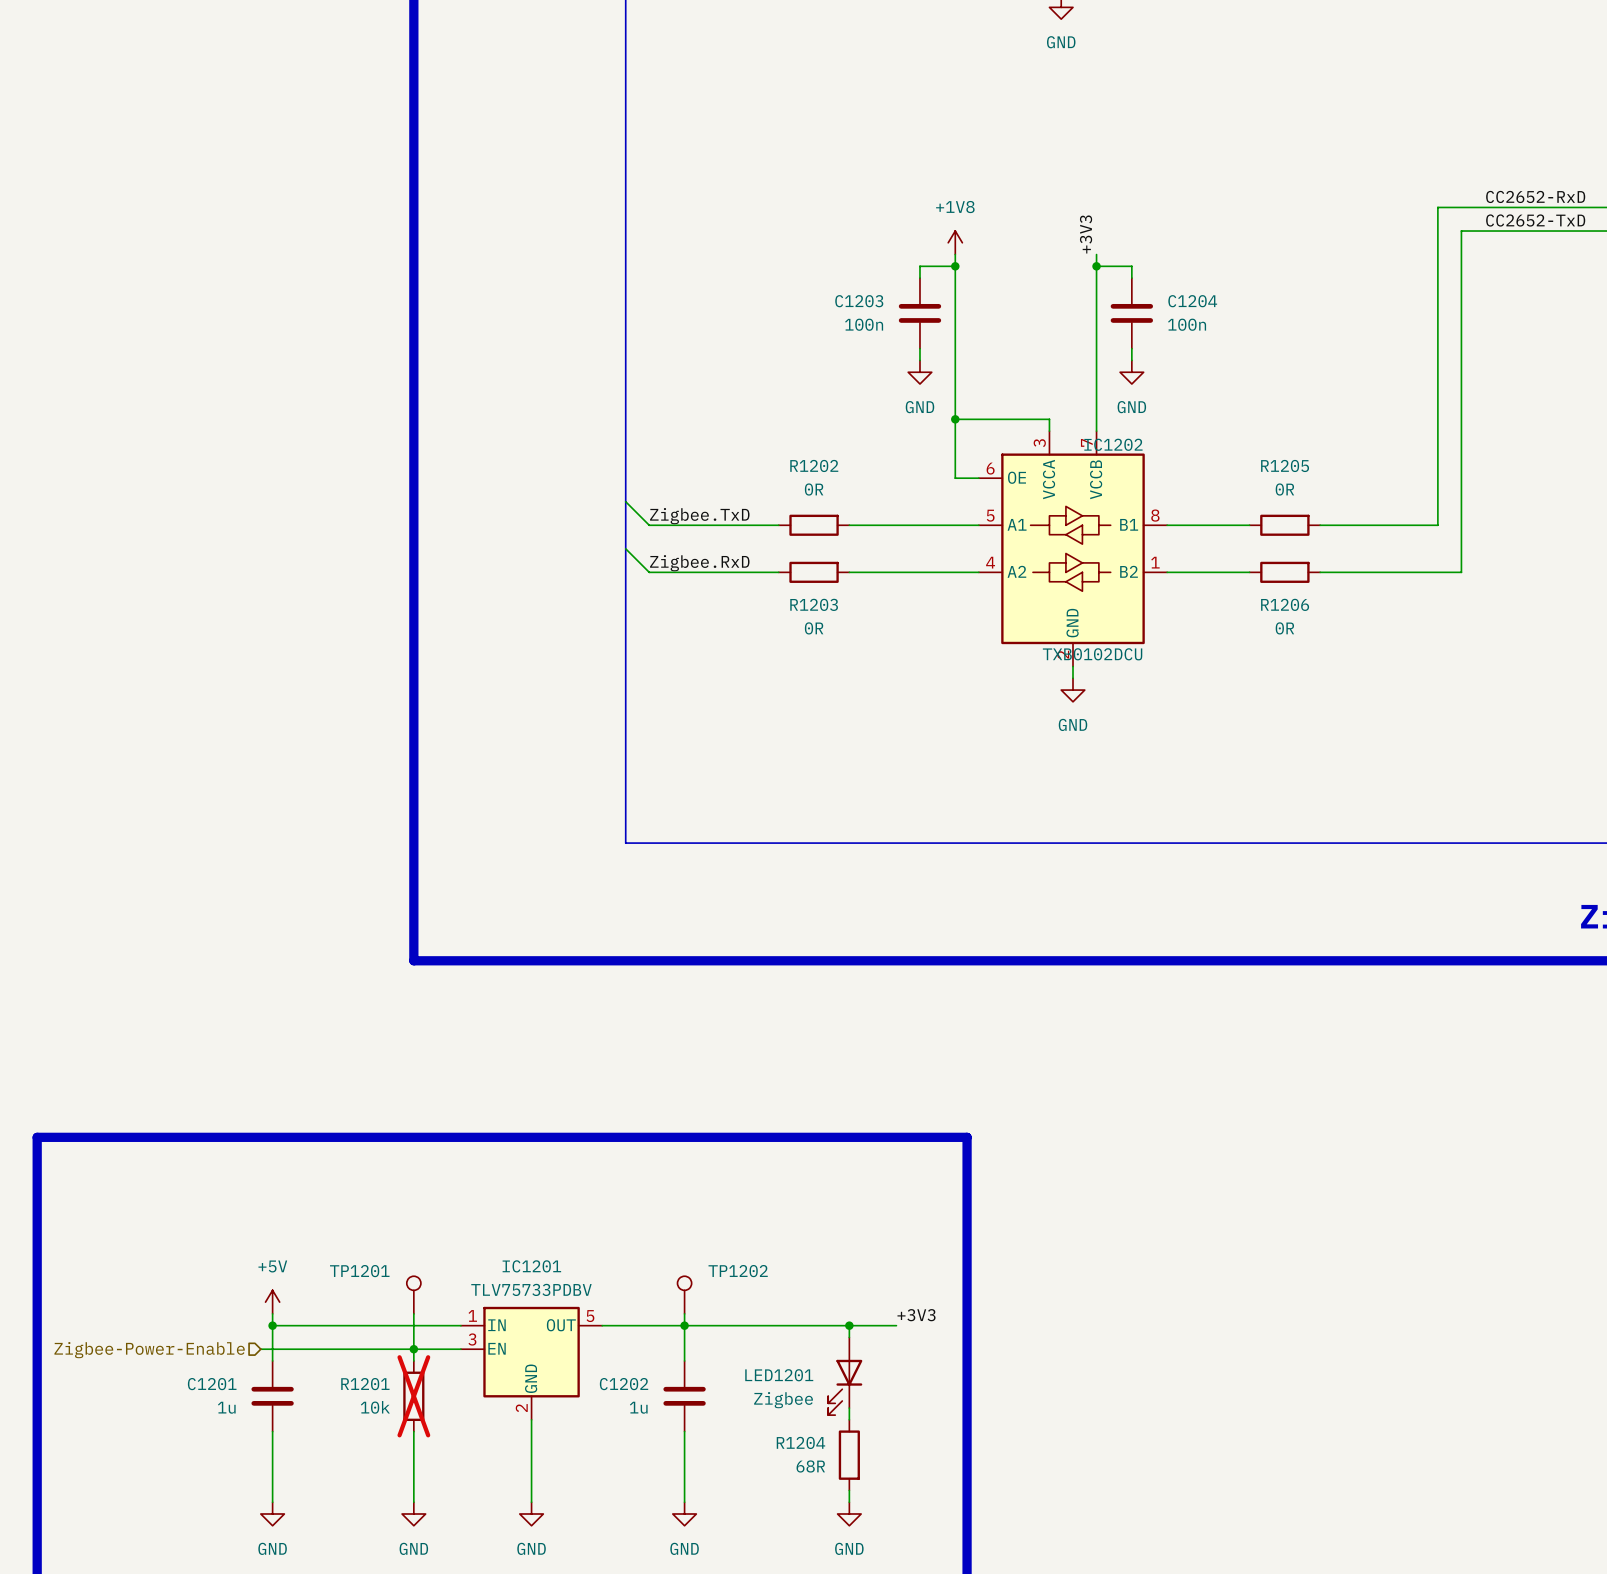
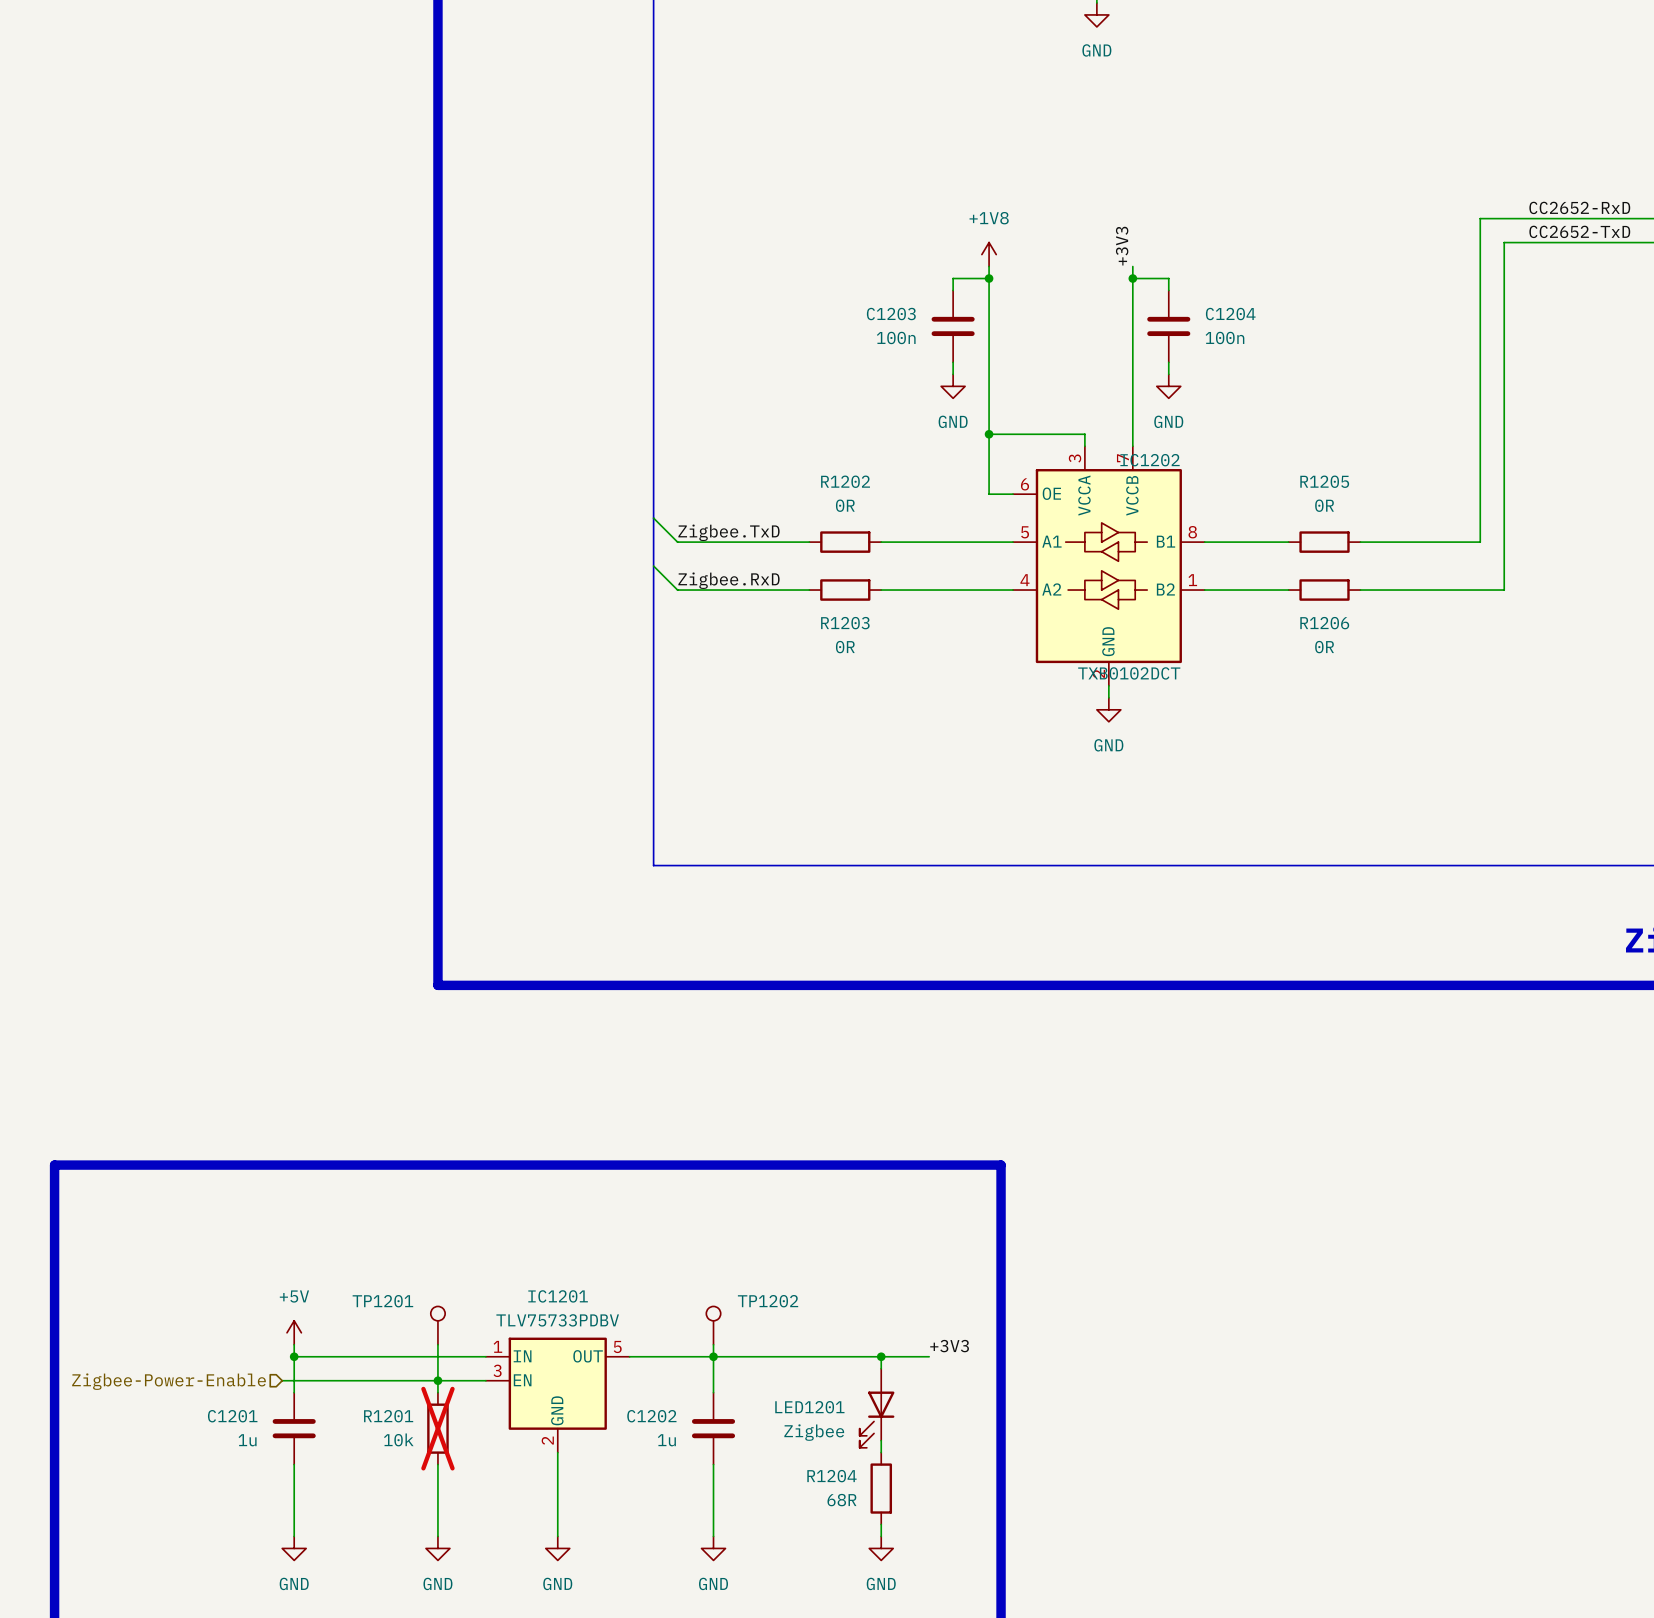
IC1202 value: TXB0102DCU (1092, 654) -> TXB0102DCT (1129, 673)

